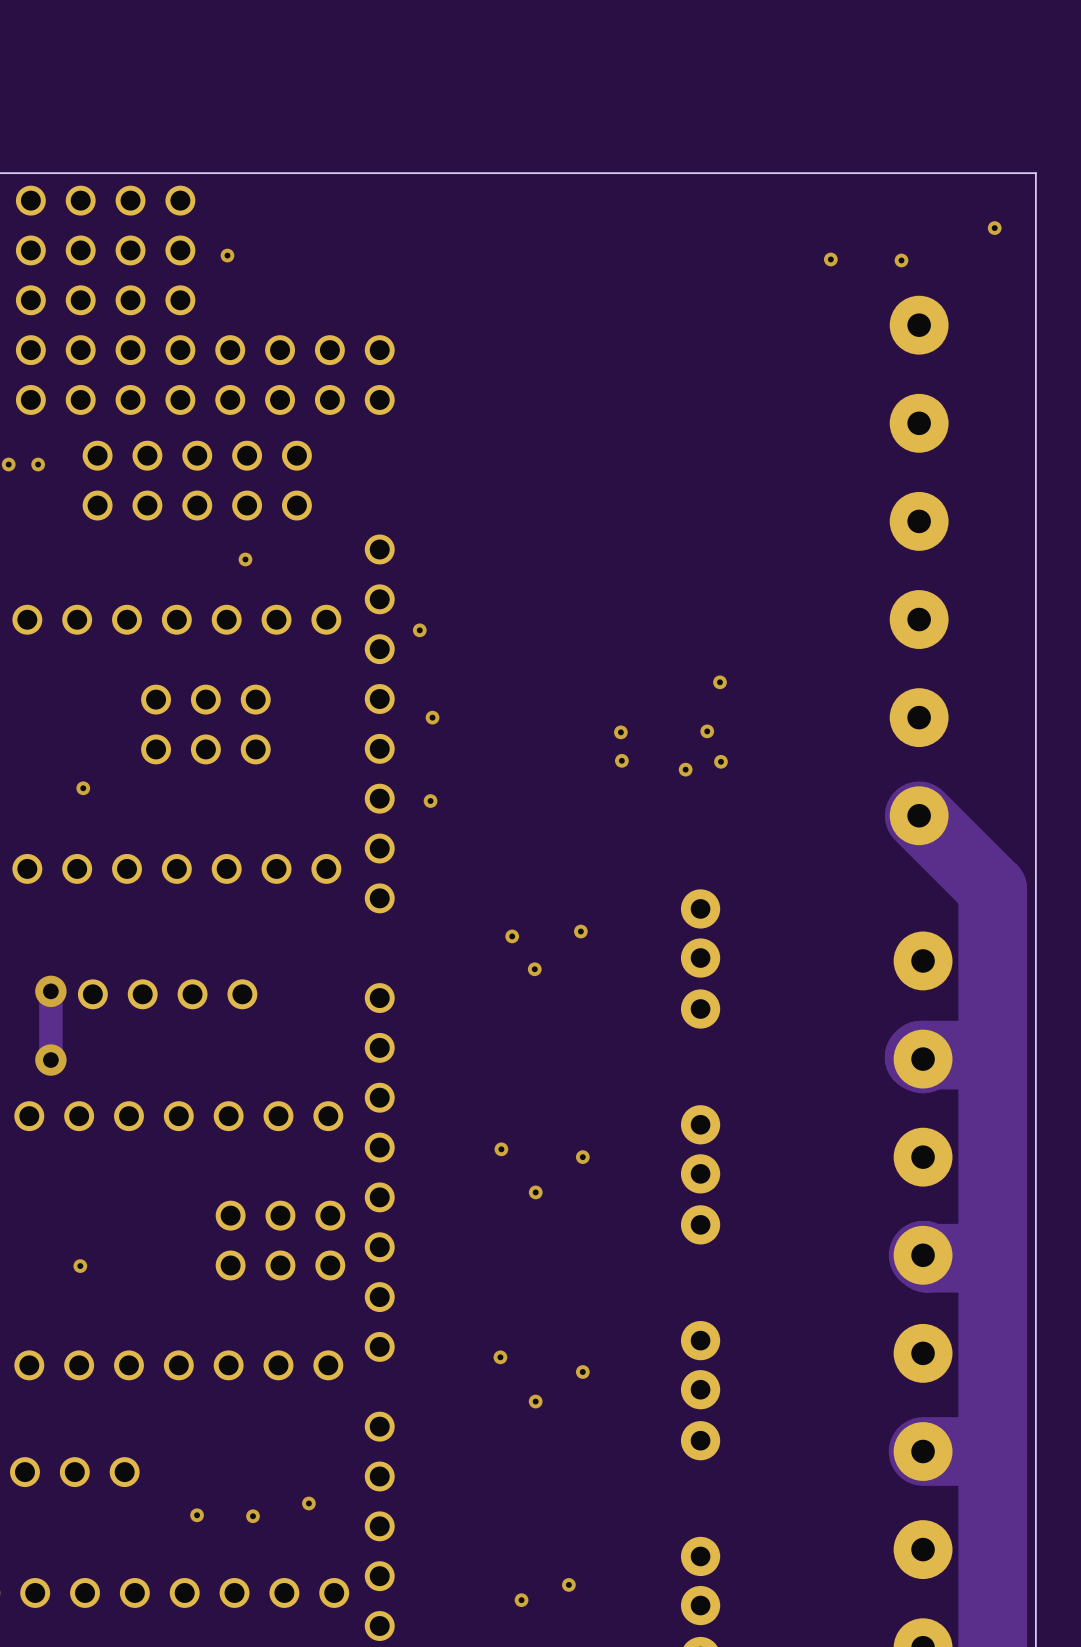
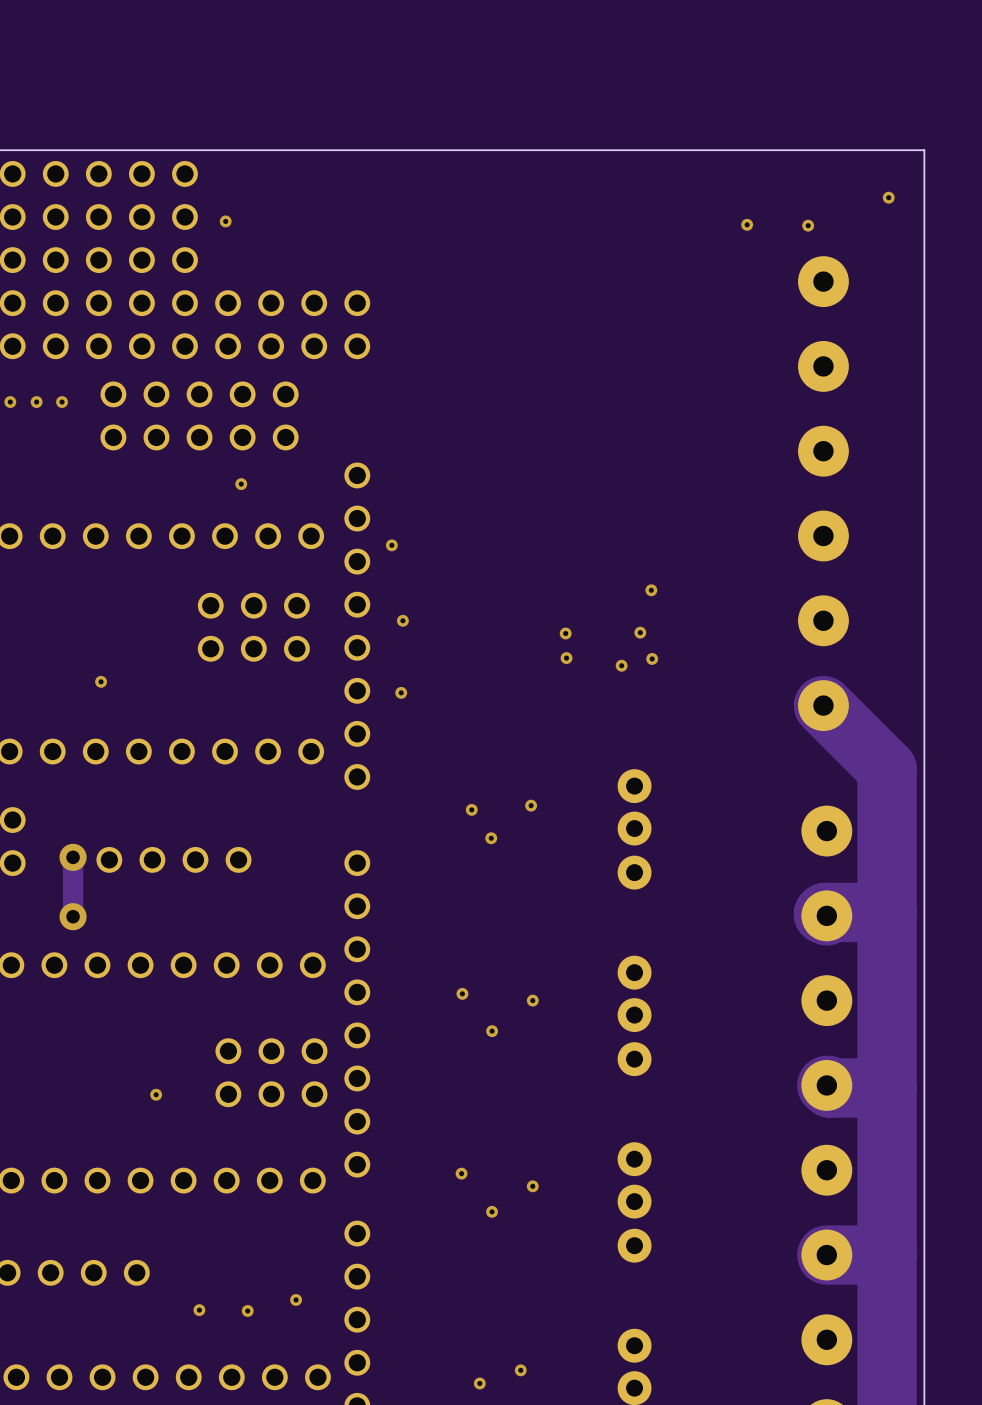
part position: (205, 724) -> (253, 627)
via position: (80, 1266) -> (156, 1094)

